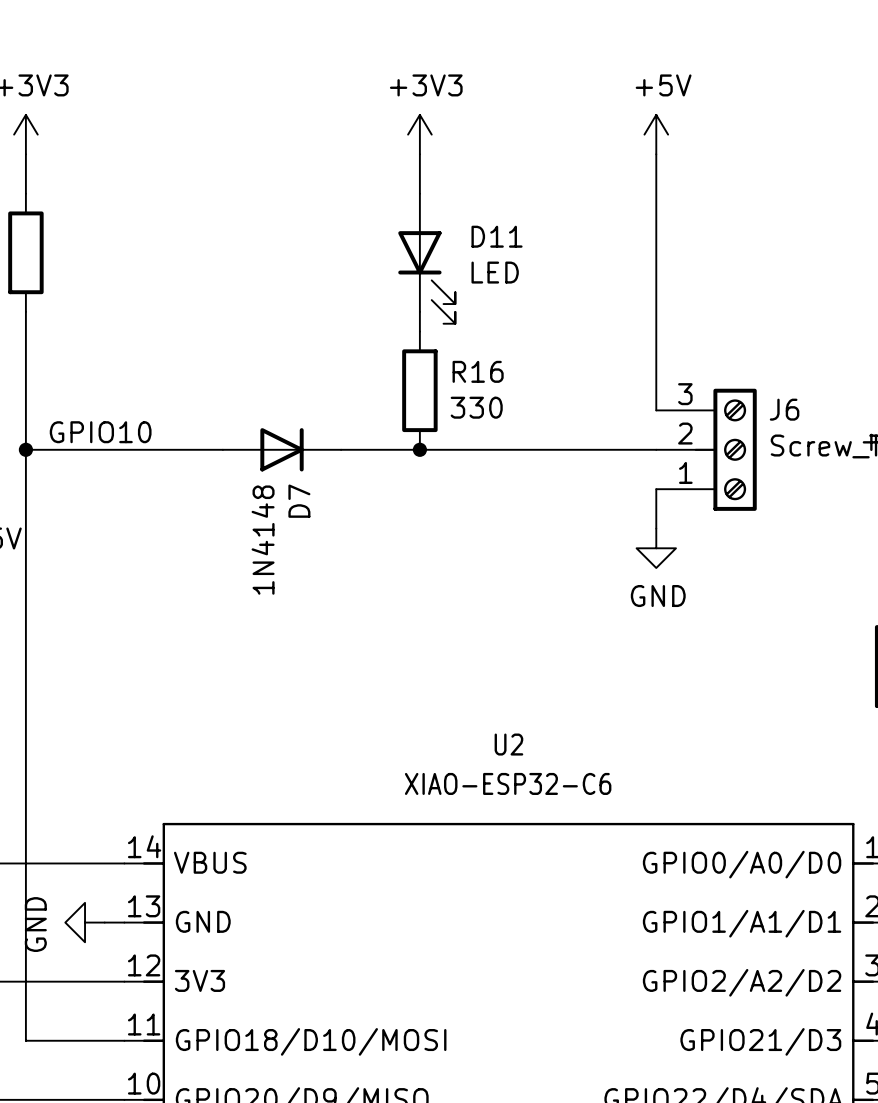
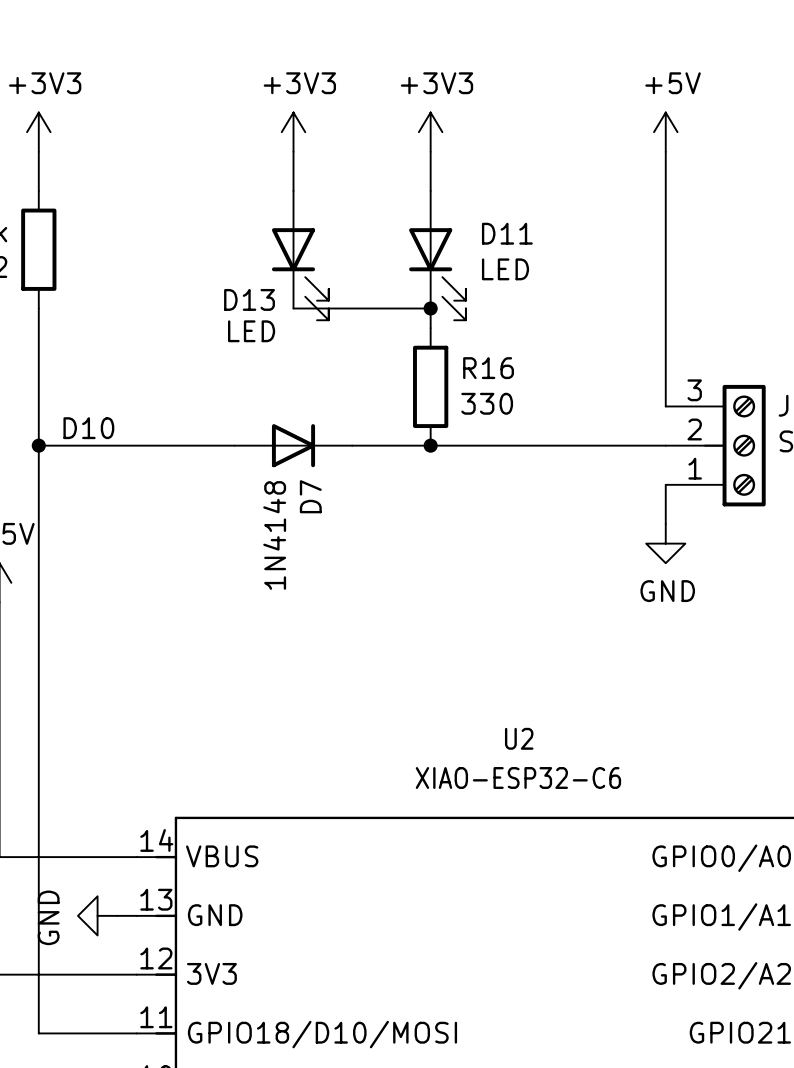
power symbol: none -> +3V3 (293, 132)
wire: none -> (293, 151) (293, 190)
D13: none -> LED (300, 255)
wire: none -> (293, 308) (430, 308)
junction: none -> (430, 308)
label: GPIO10 (100, 432) -> D10 (88, 428)

